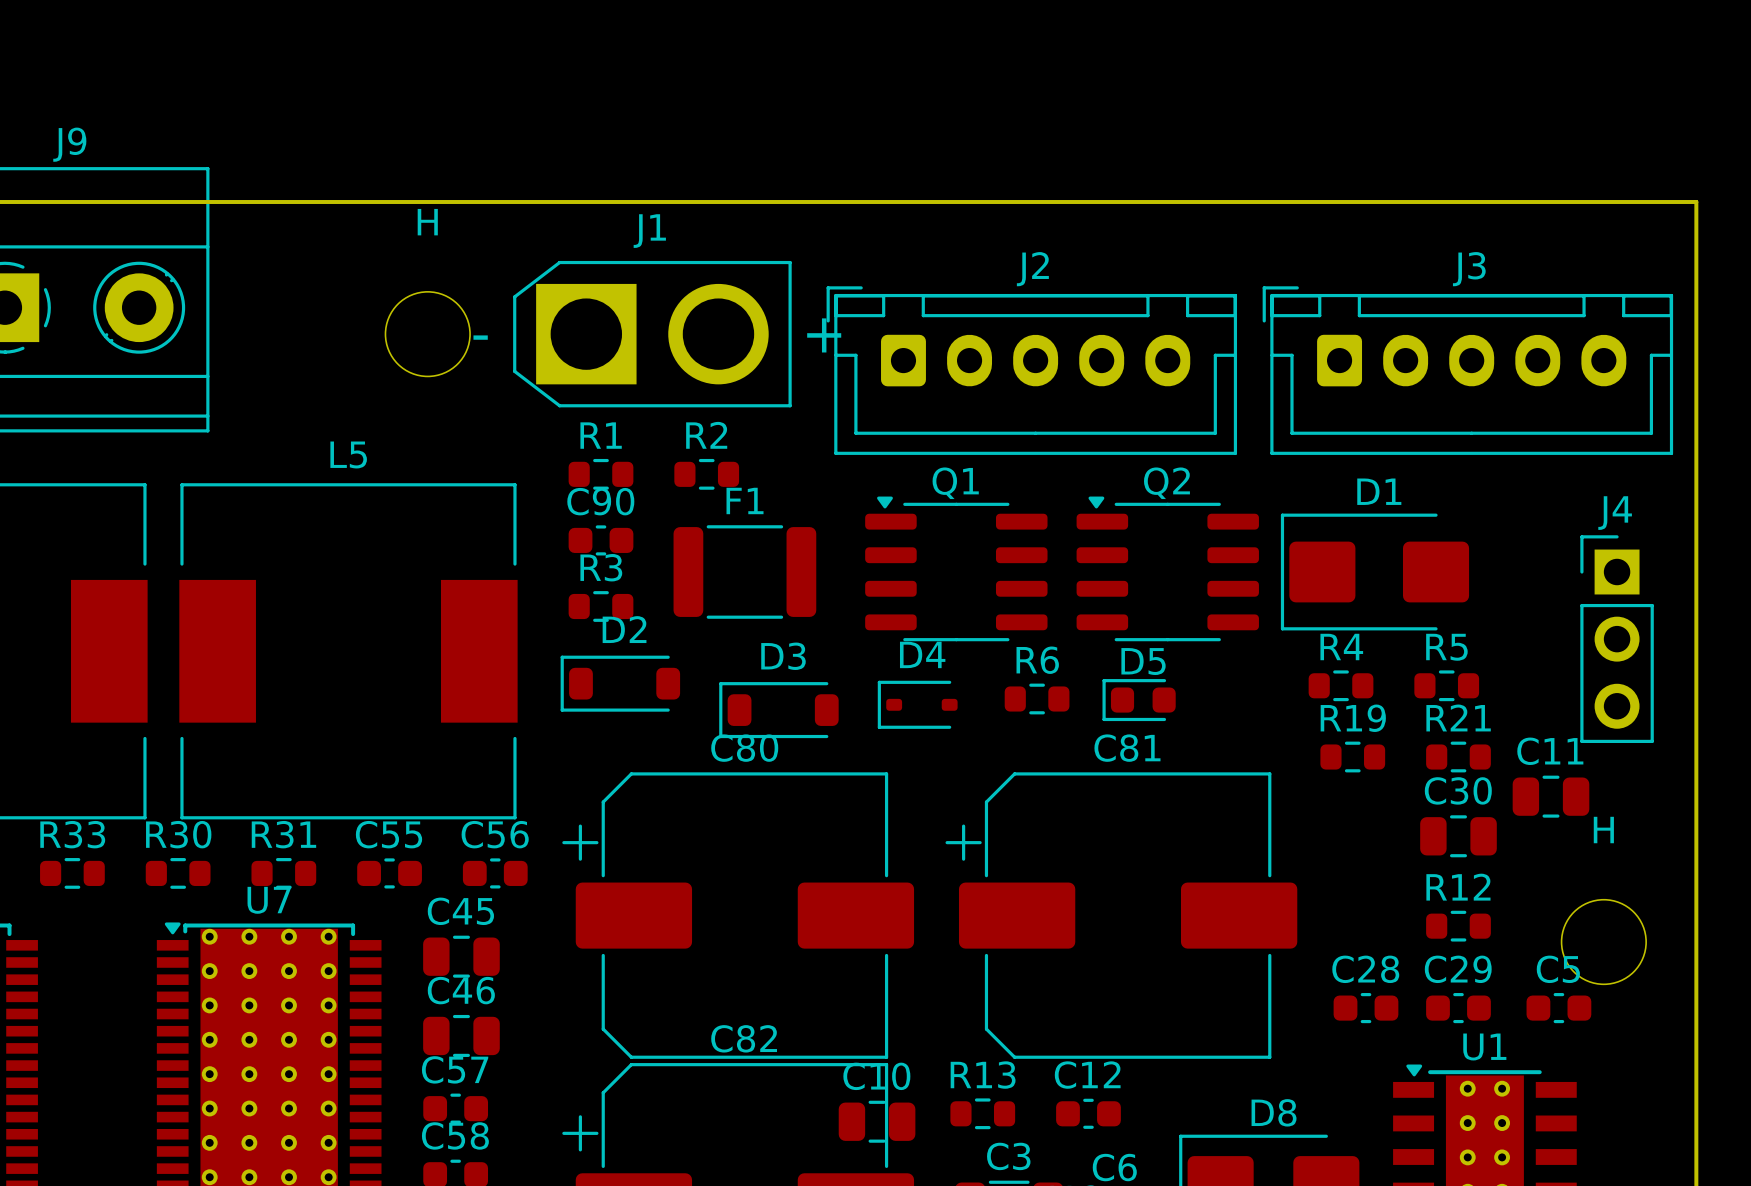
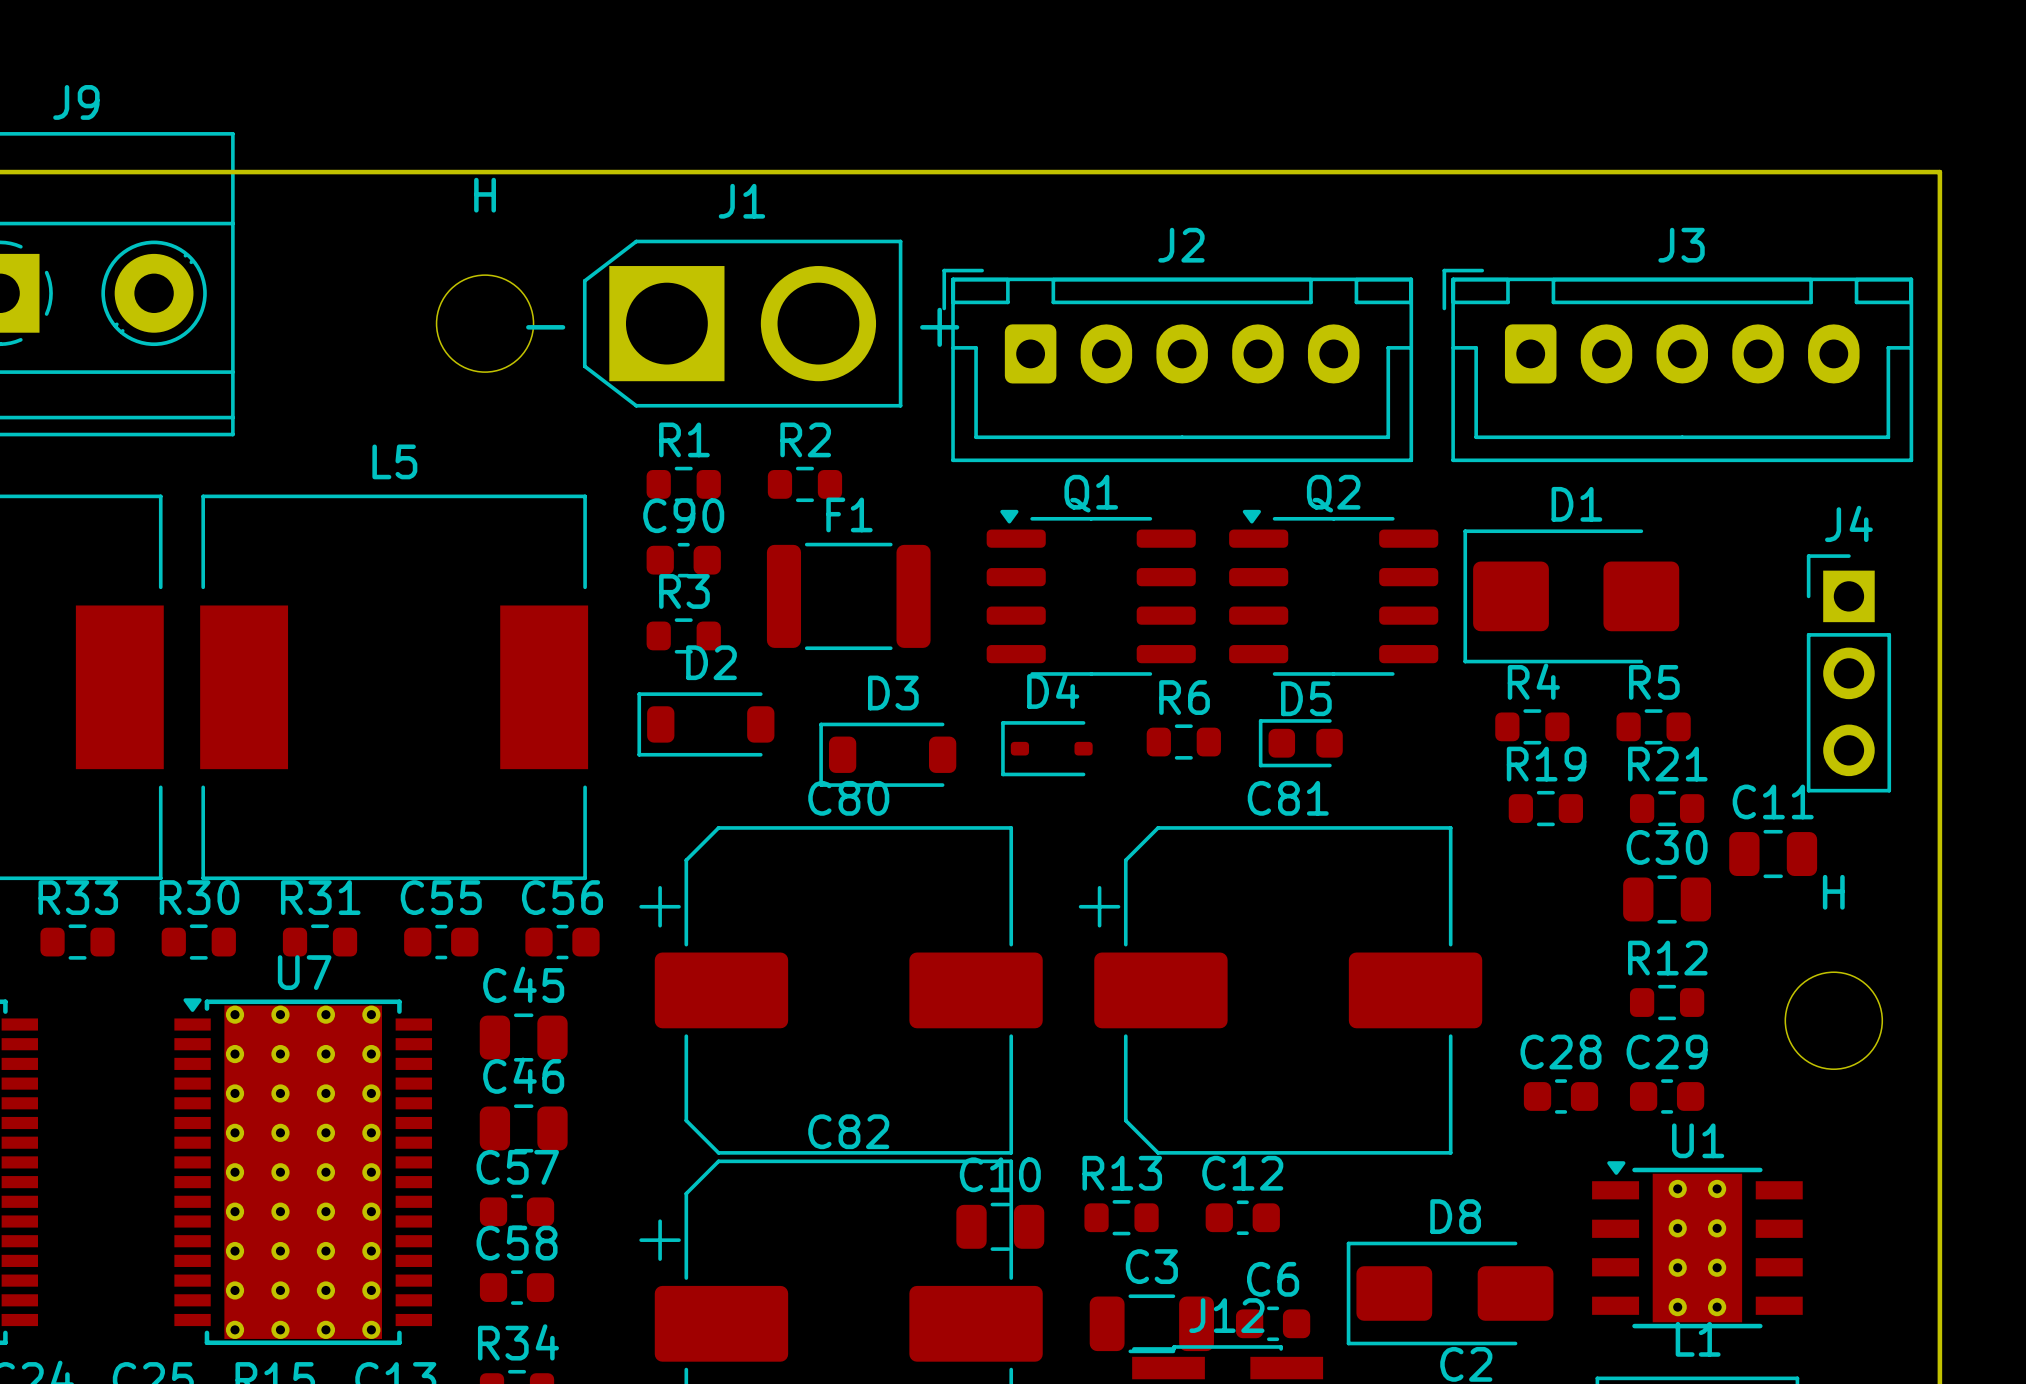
C5: (1558, 1008) -> none

